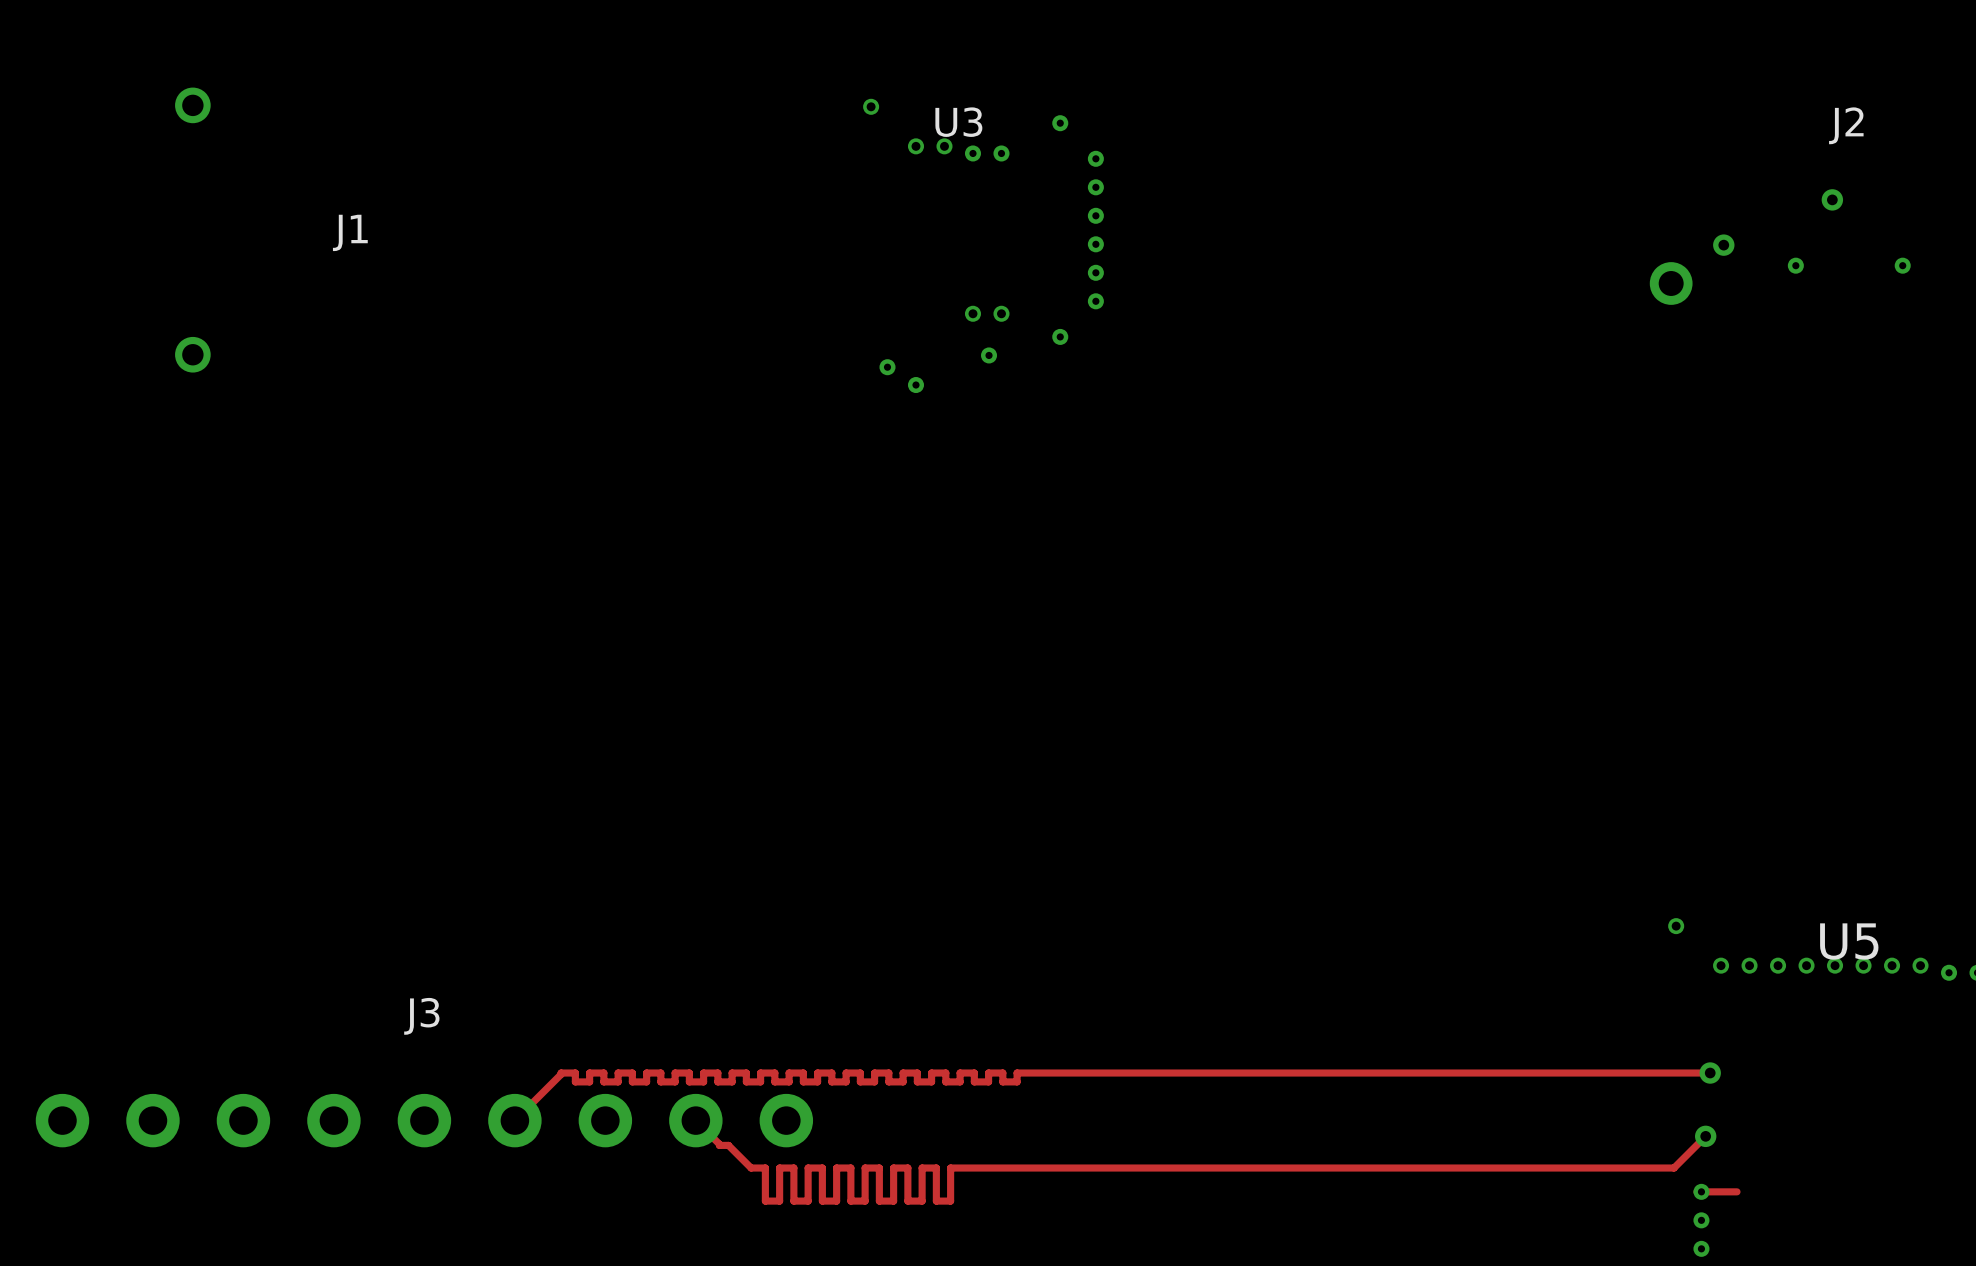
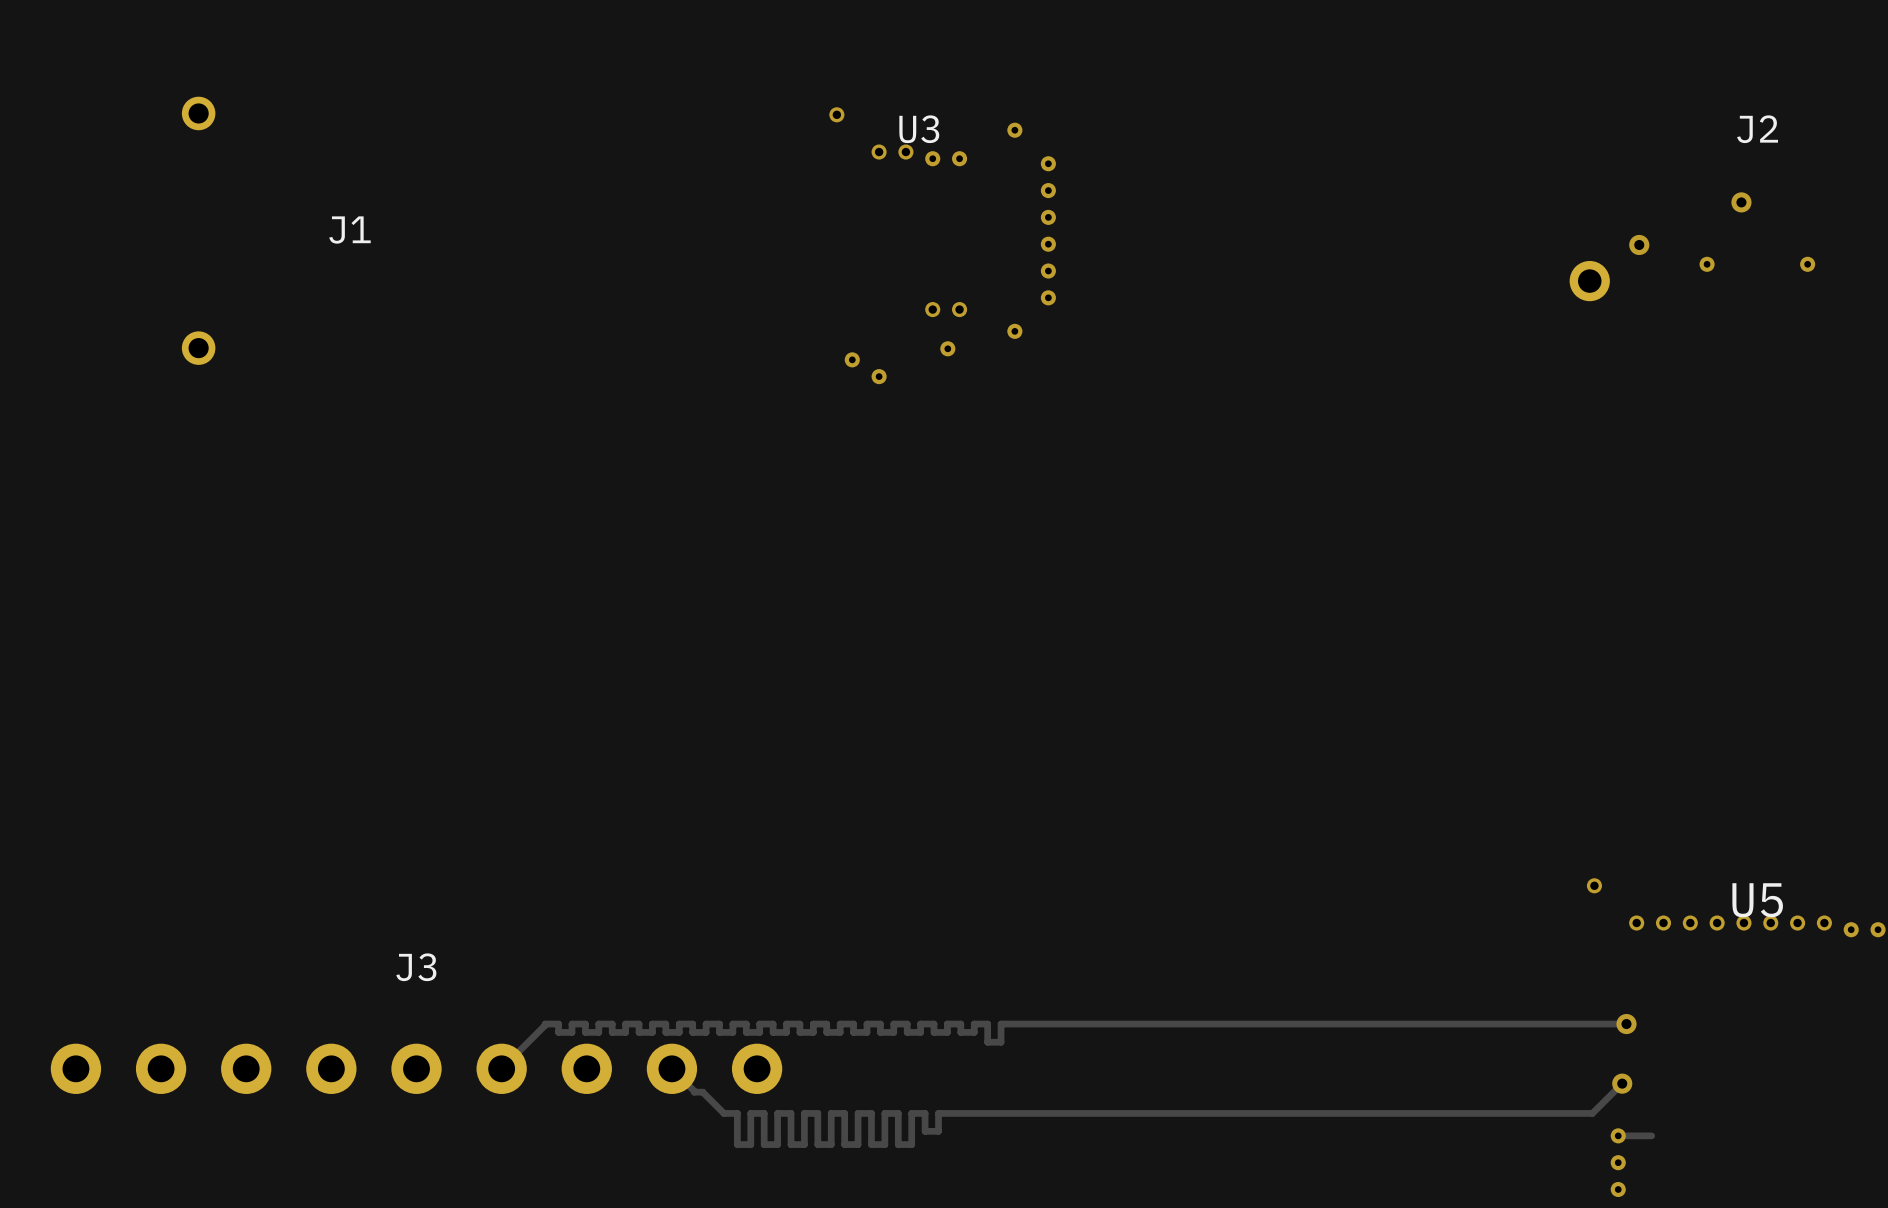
track: (1031, 1073) (1045, 1073) -> (987, 1024) (987, 1042) (1001, 1042) (1001, 1024)
track: (964, 1168) (979, 1168) -> (925, 1113) (925, 1131) (938, 1131) (938, 1113)

